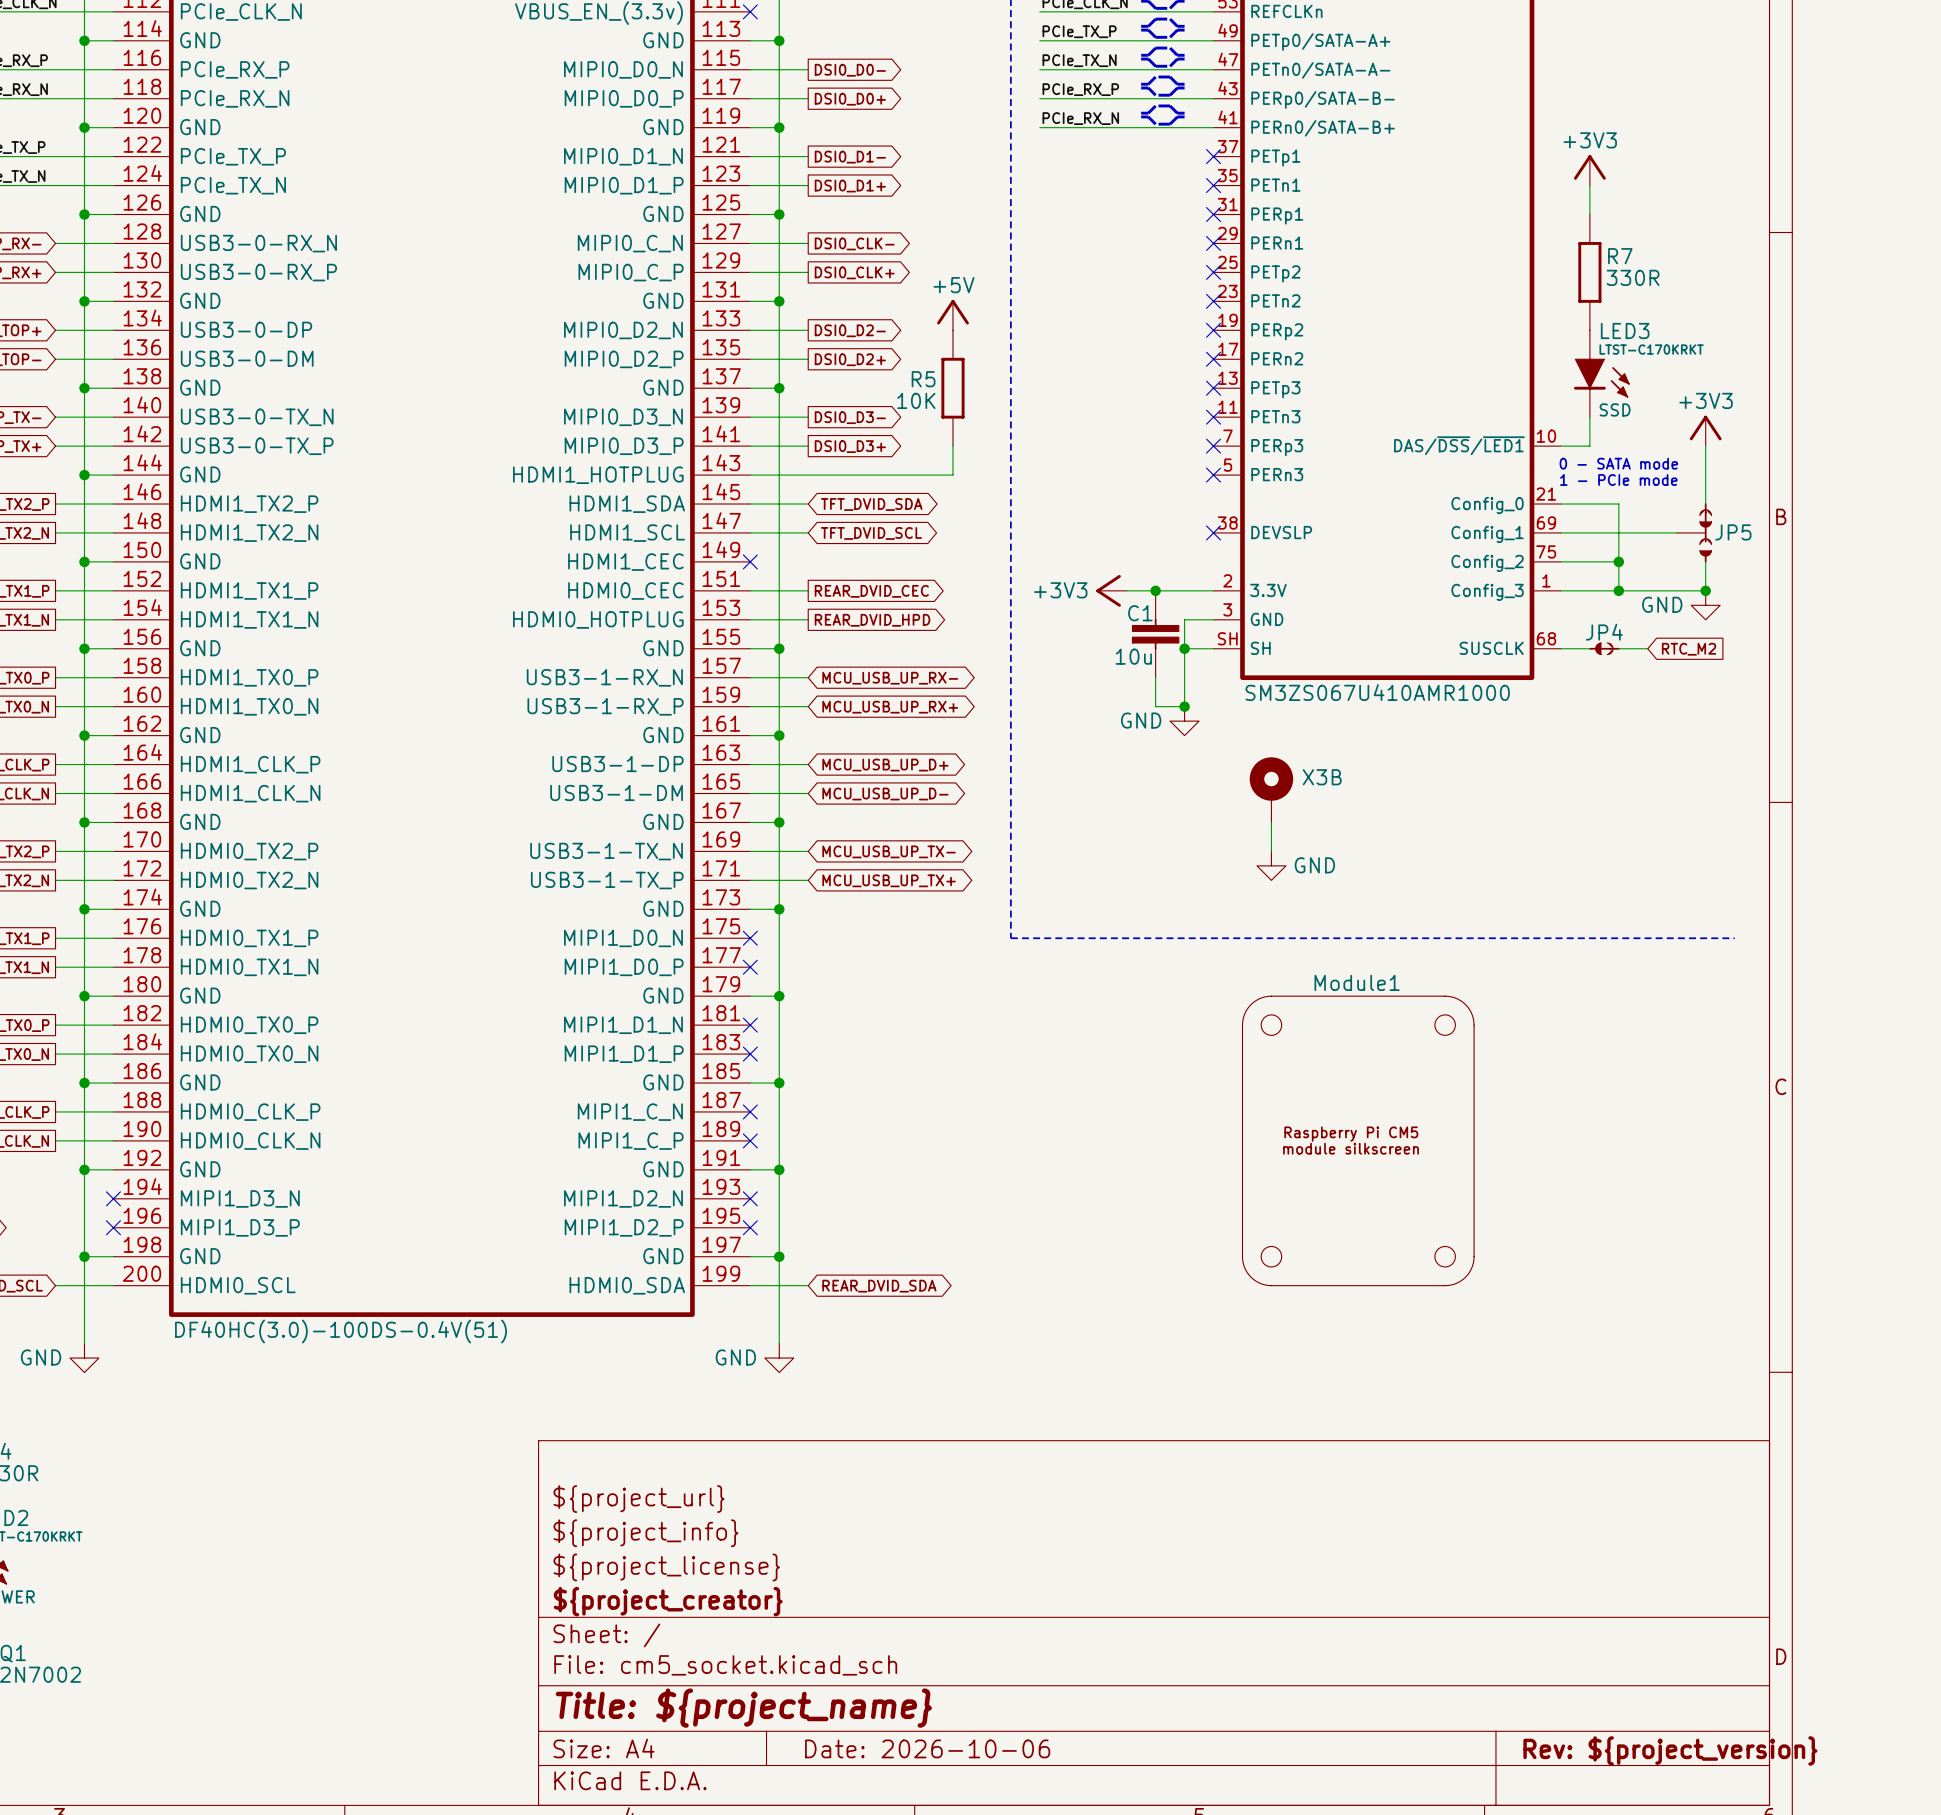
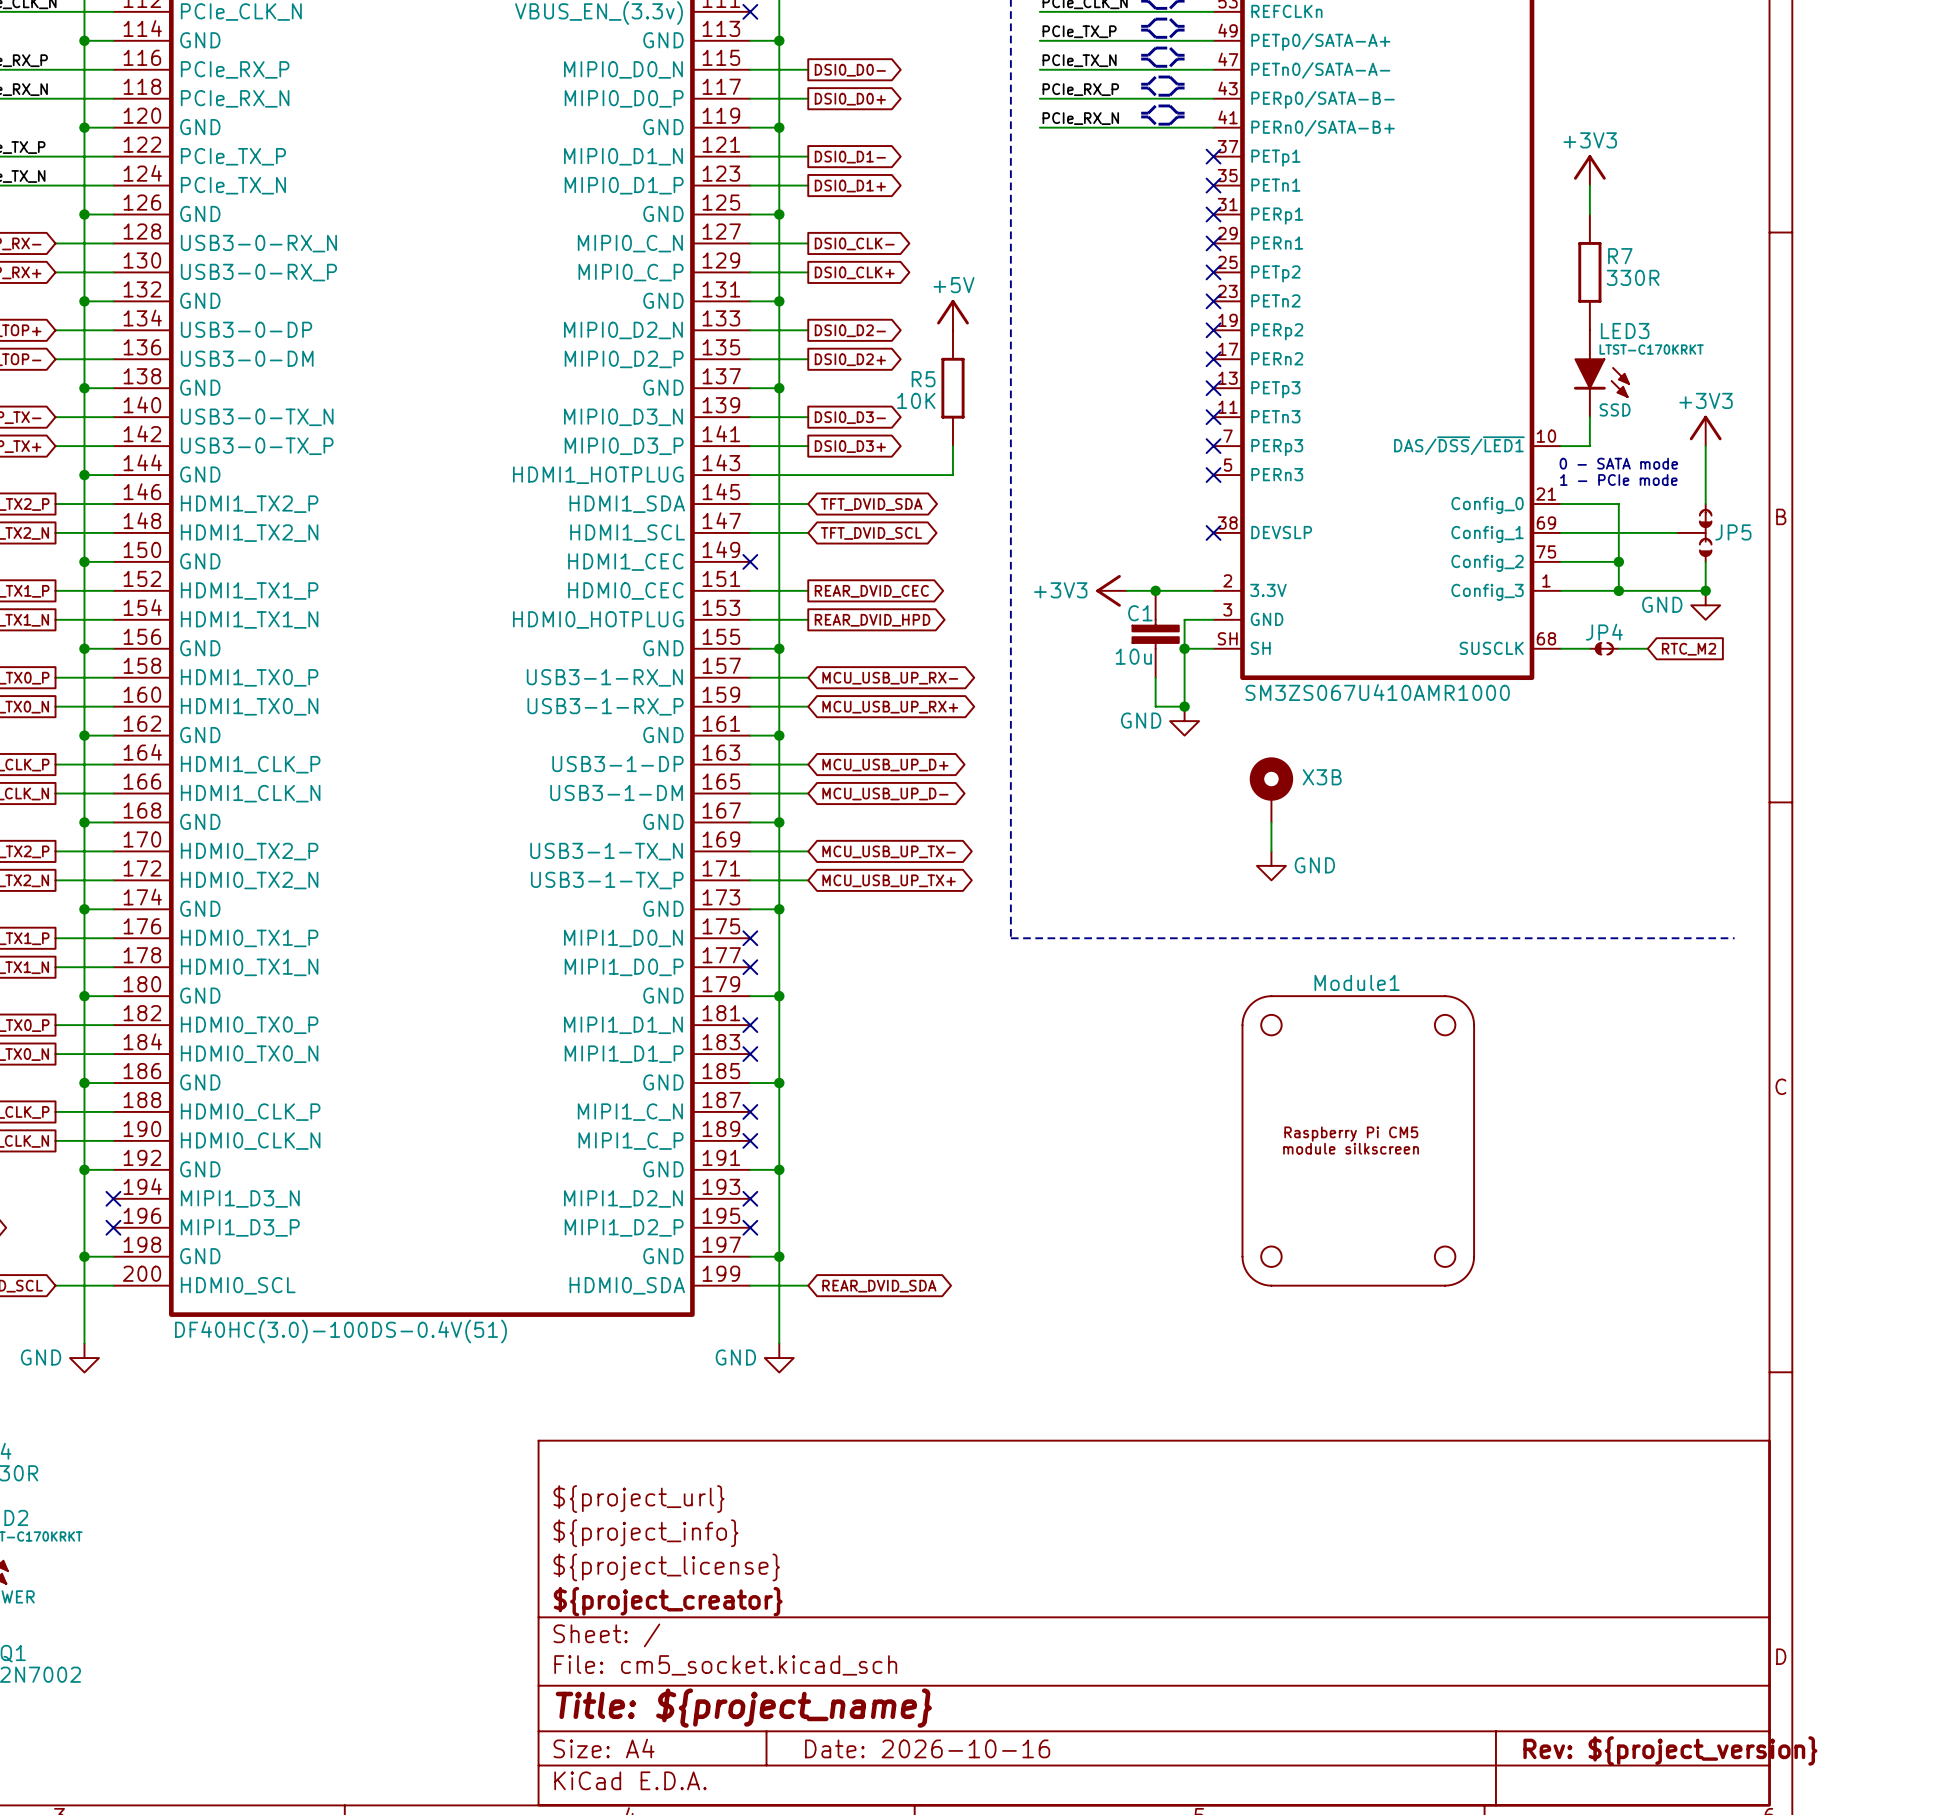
title block: Date: 2026-10-06 (927, 1748) -> Date: 2026-10-16 (927, 1748)

